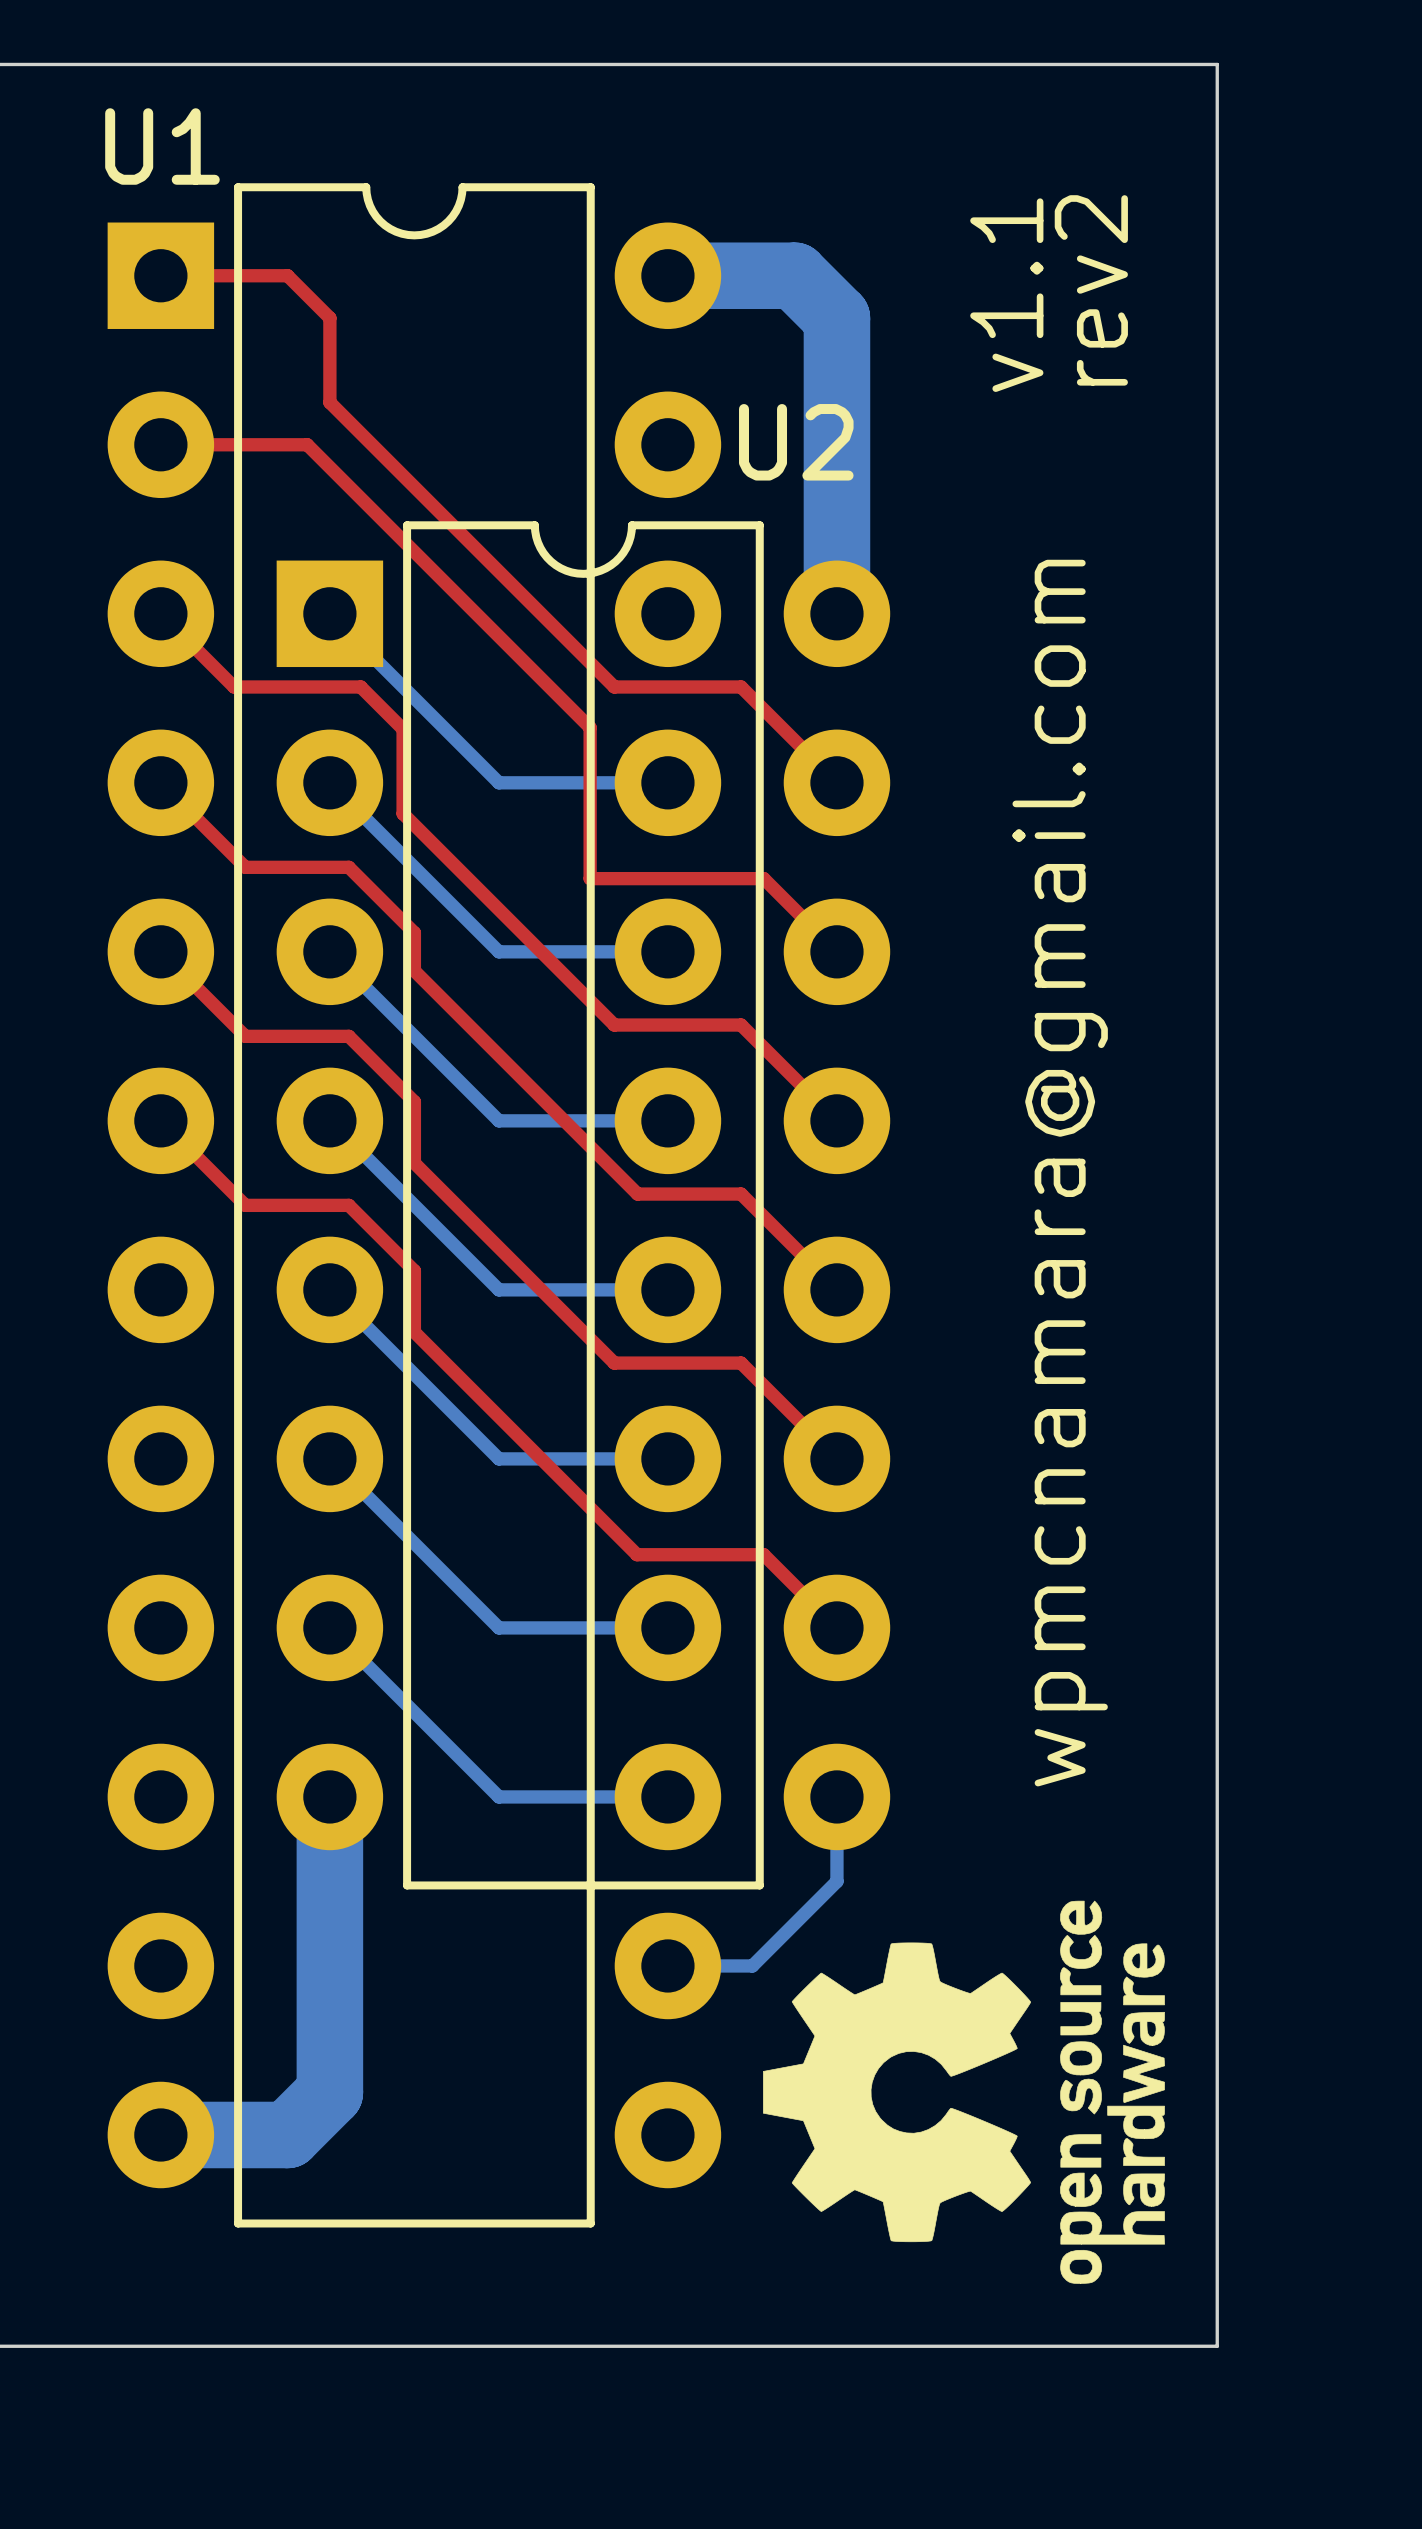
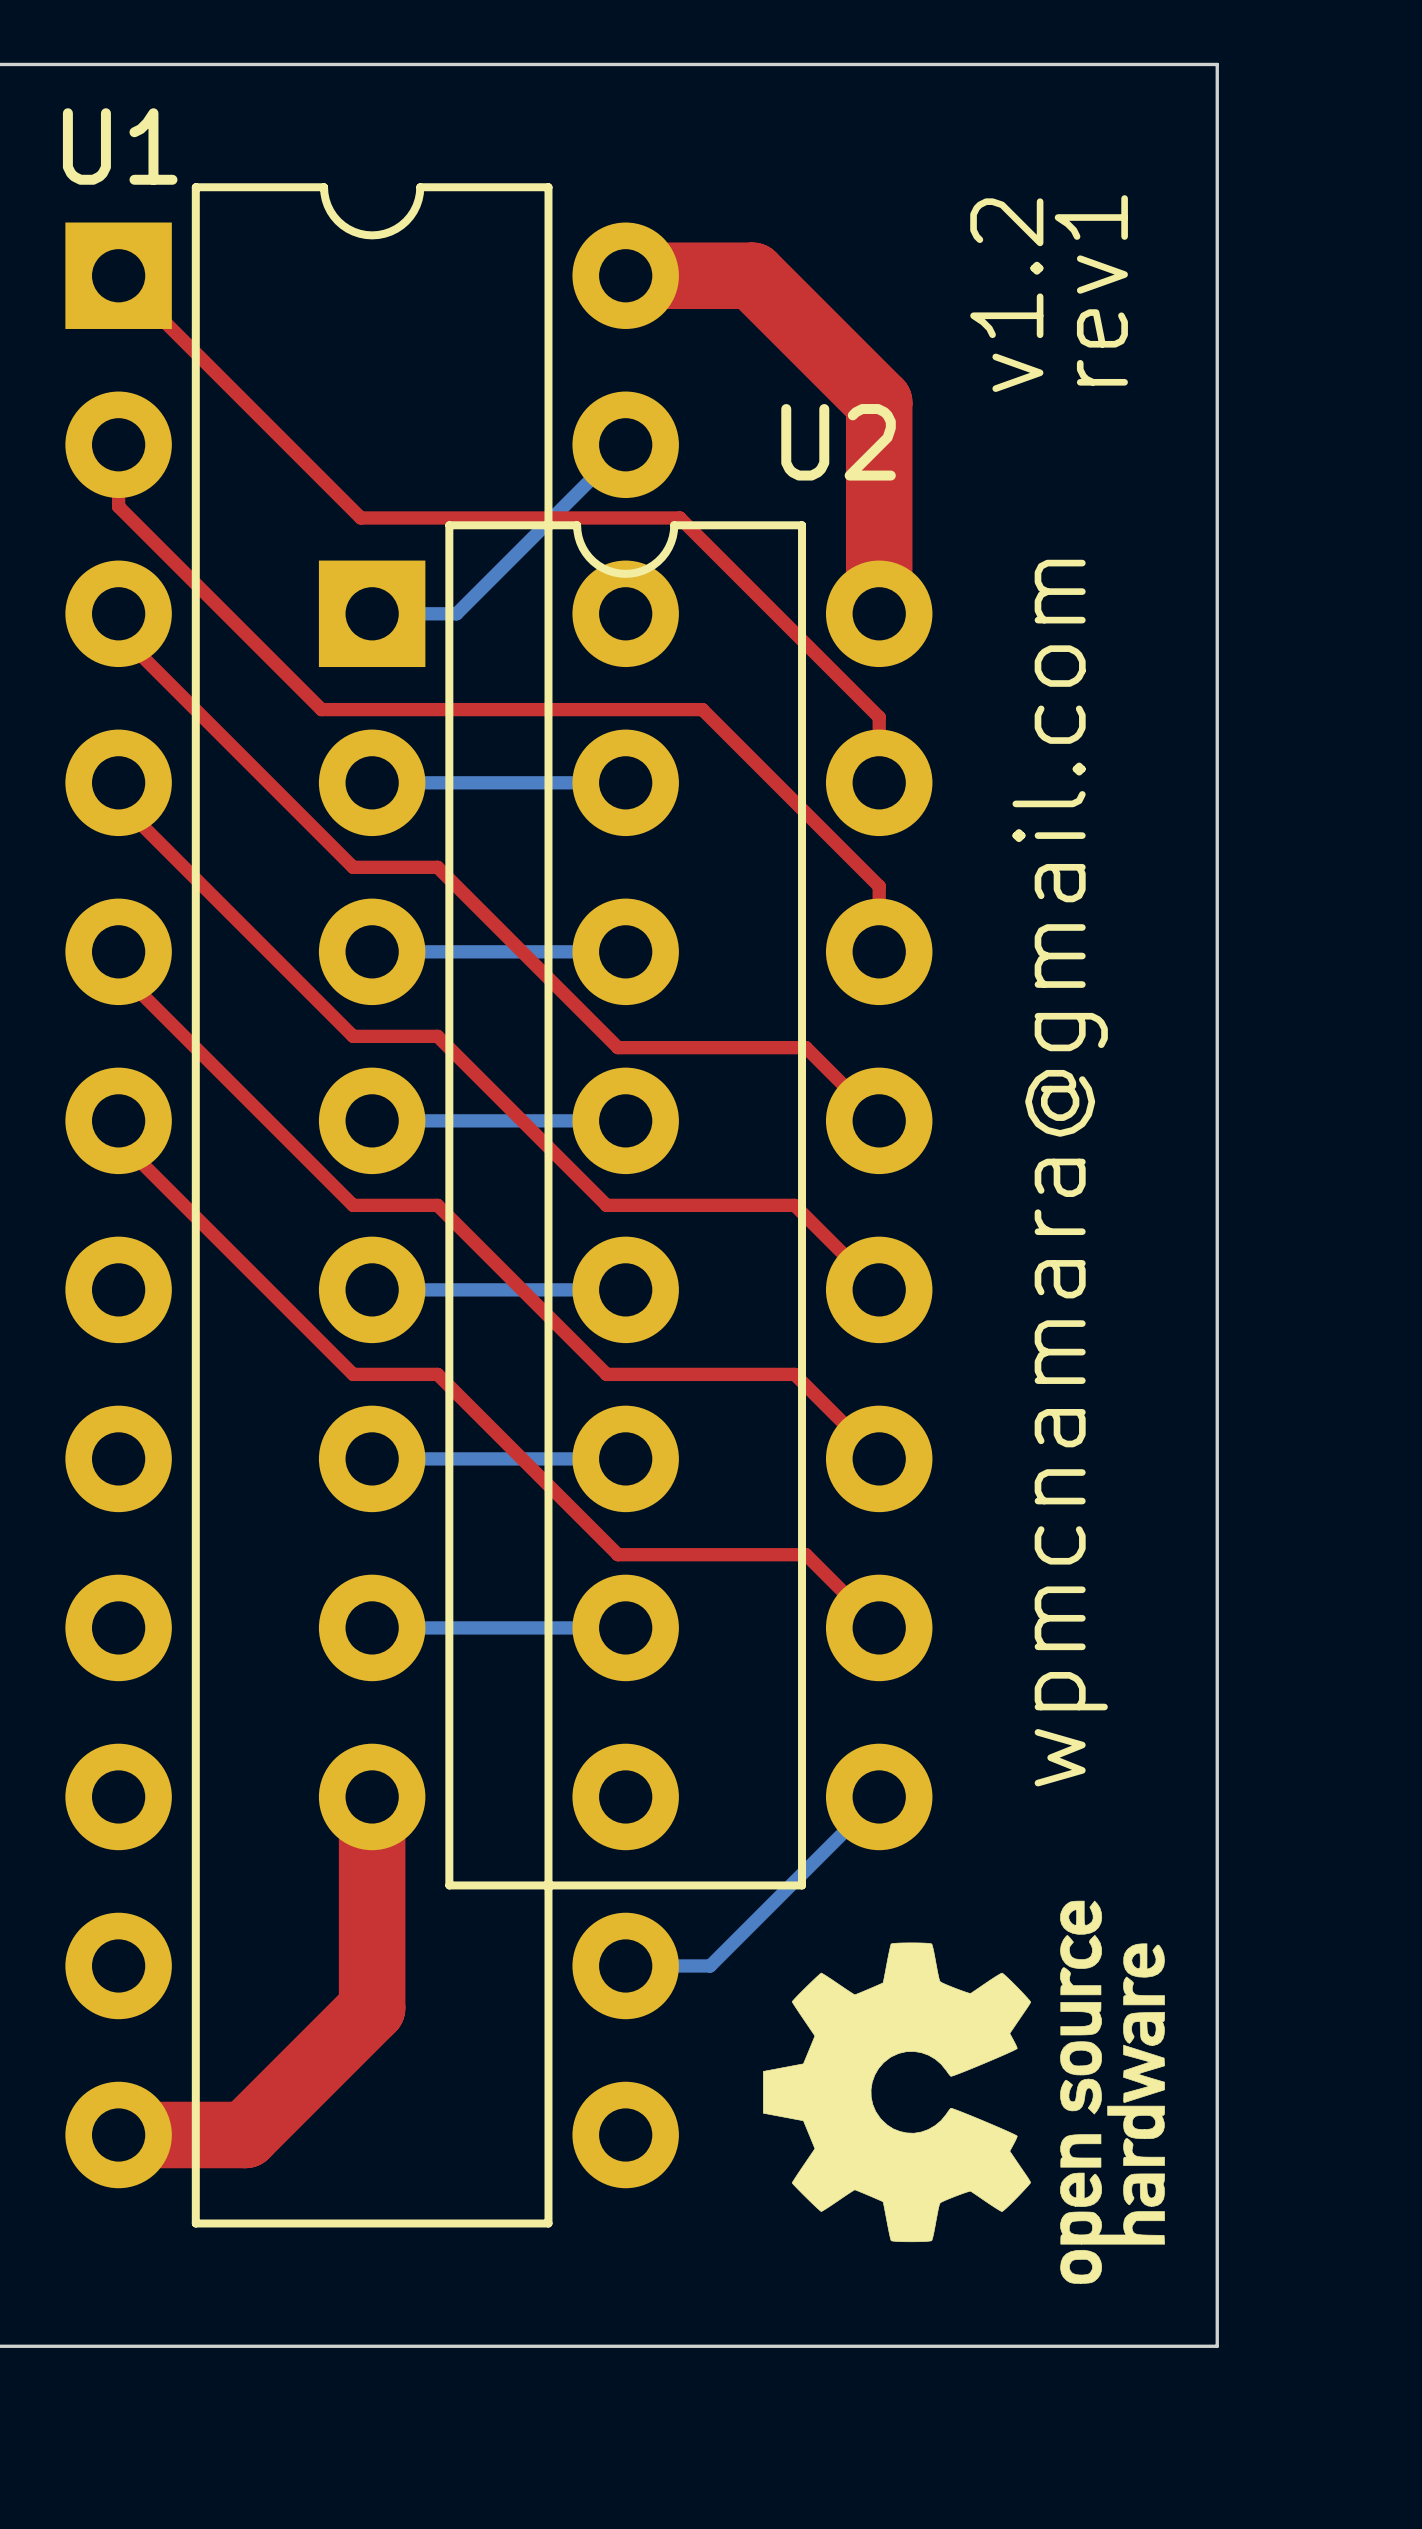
top track: none -> (118, 275) (360, 517) (679, 517) (879, 717) (879, 782)
top track: (160, 275) (287, 275) (329, 318) (329, 402) (614, 686) (741, 686) (836, 782) -> none
top track: none -> (625, 275) (752, 275) (879, 402) (879, 613)
bottom track: (667, 275) (794, 275) (836, 318) (836, 613) -> none
text: rev2 (1091, 290) -> rev1 (1091, 290)
text: v1.1 (1006, 295) -> v1.2 (1006, 295)
top track: none -> (118, 444) (118, 506) (321, 709) (702, 709) (879, 886) (879, 951)
top track: (160, 444) (307, 444) (590, 727) (590, 878) (763, 878) (836, 951) -> none
bottom track: none -> (625, 444) (456, 613) (372, 613)
top track: none -> (118, 613) (118, 632) (353, 867) (437, 867) (617, 1047) (806, 1047) (879, 1120)
top track: (160, 613) (234, 686) (360, 686) (403, 729) (403, 813) (614, 1025) (741, 1025) (836, 1120) -> none
bottom track: (329, 613) (498, 782) -> (372, 782) (498, 782)
top track: none -> (118, 782) (118, 801) (353, 1036) (437, 1036) (606, 1205) (794, 1205) (879, 1289)
top track: (160, 782) (245, 867) (348, 867) (414, 932) (414, 970) (637, 1194) (741, 1194) (836, 1289) -> none
bottom track: (329, 782) (498, 951) -> (372, 951) (498, 951)
top track: none -> (118, 951) (118, 970) (353, 1205) (437, 1205) (606, 1374) (794, 1374) (879, 1458)
top track: (160, 951) (245, 1036) (348, 1036) (414, 1101) (414, 1163) (614, 1363) (741, 1363) (836, 1458) -> none
bottom track: (329, 951) (498, 1120) -> (372, 1120) (498, 1120)
top track: (160, 1120) (245, 1205) (348, 1205) (414, 1270) (414, 1332) (636, 1554) -> (118, 1120) (118, 1139) (353, 1374) (437, 1374) (617, 1554) (636, 1554)
bottom track: (329, 1120) (498, 1289) -> (372, 1289) (498, 1289)
U1 position: (414, 1205) -> (372, 1205)
U2 position: (583, 1205) -> (625, 1205)
bottom track: (329, 1289) (498, 1458) -> (372, 1458) (498, 1458)
bottom track: (329, 1458) (498, 1627) -> (372, 1627) (498, 1627)
top track: (763, 1554) (836, 1627) -> (763, 1554) (806, 1554) (879, 1627)
bottom track: (329, 1627) (498, 1796) (667, 1796) -> none
bottom track: (329, 1796) (329, 2092) (287, 2134) (160, 2134) -> none
top track: none -> (372, 1796) (372, 2008) (245, 2134) (118, 2134)
bottom track: (836, 1796) (836, 1881) (752, 1965) (710, 1965) -> (879, 1796) (710, 1965)

